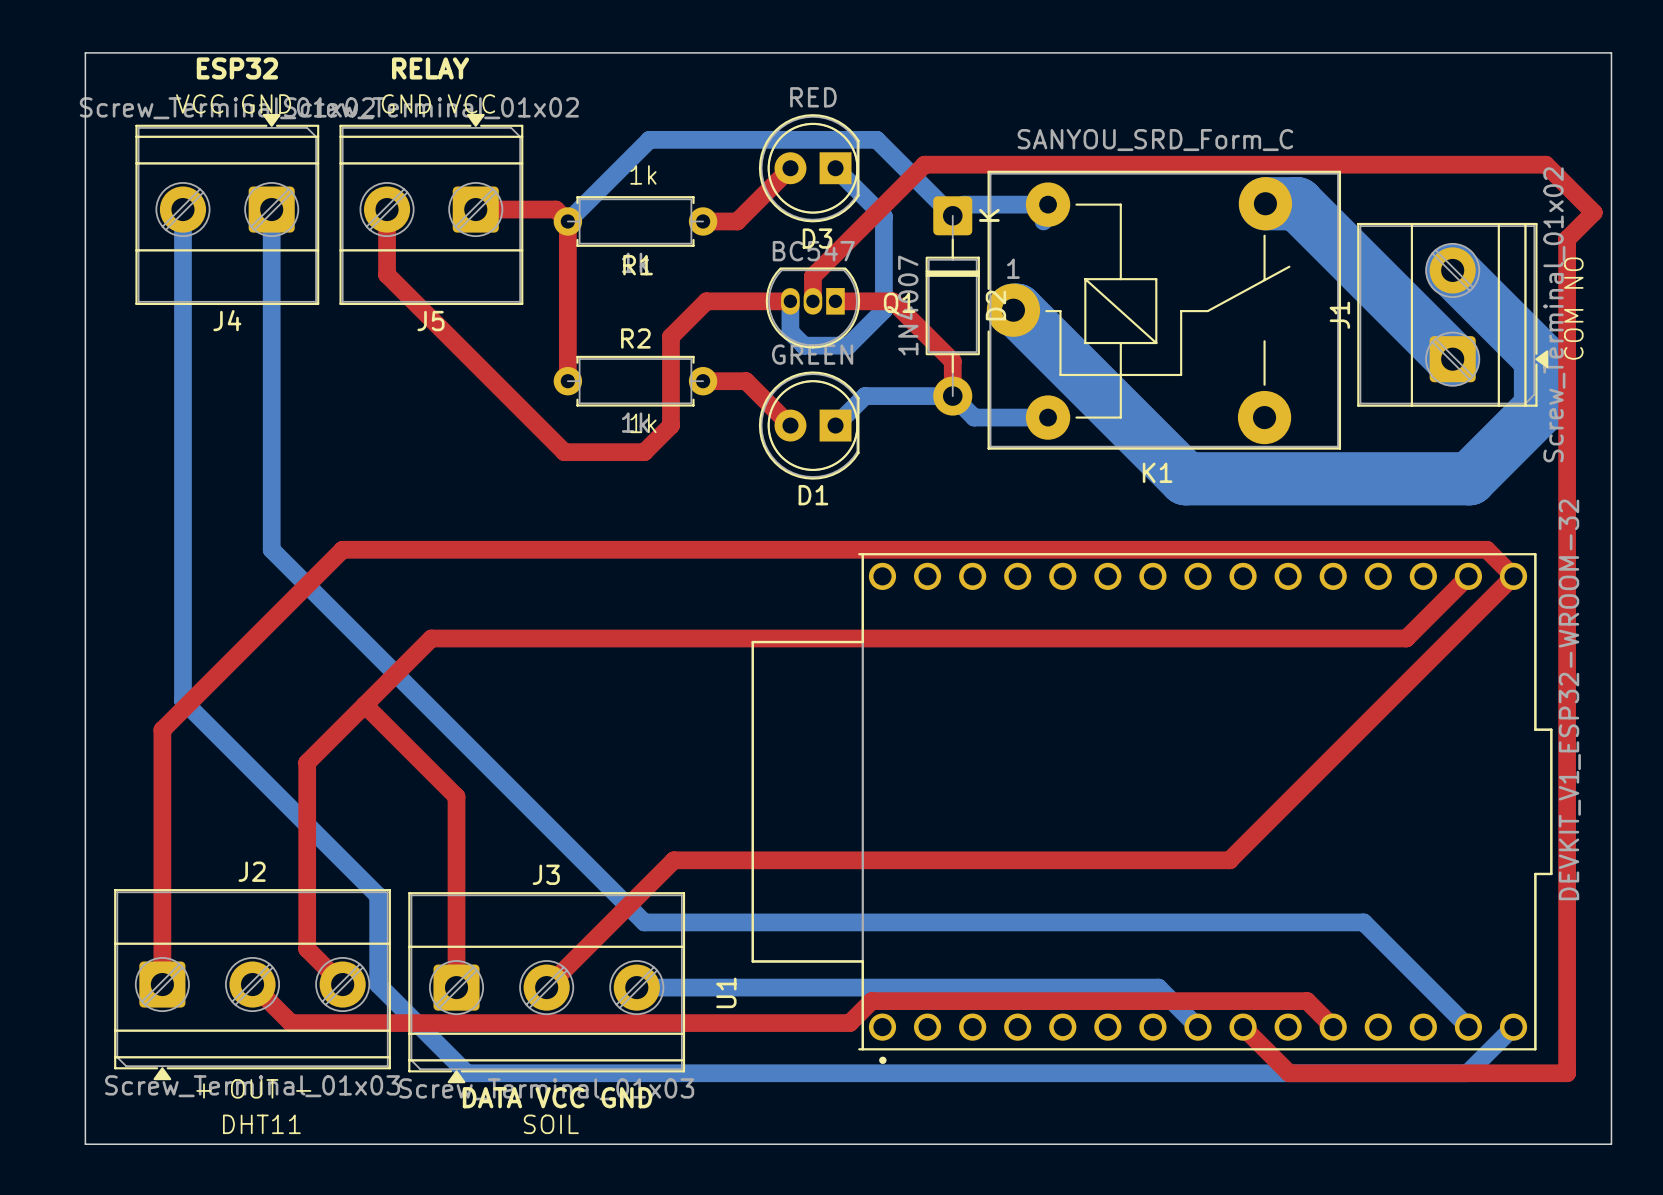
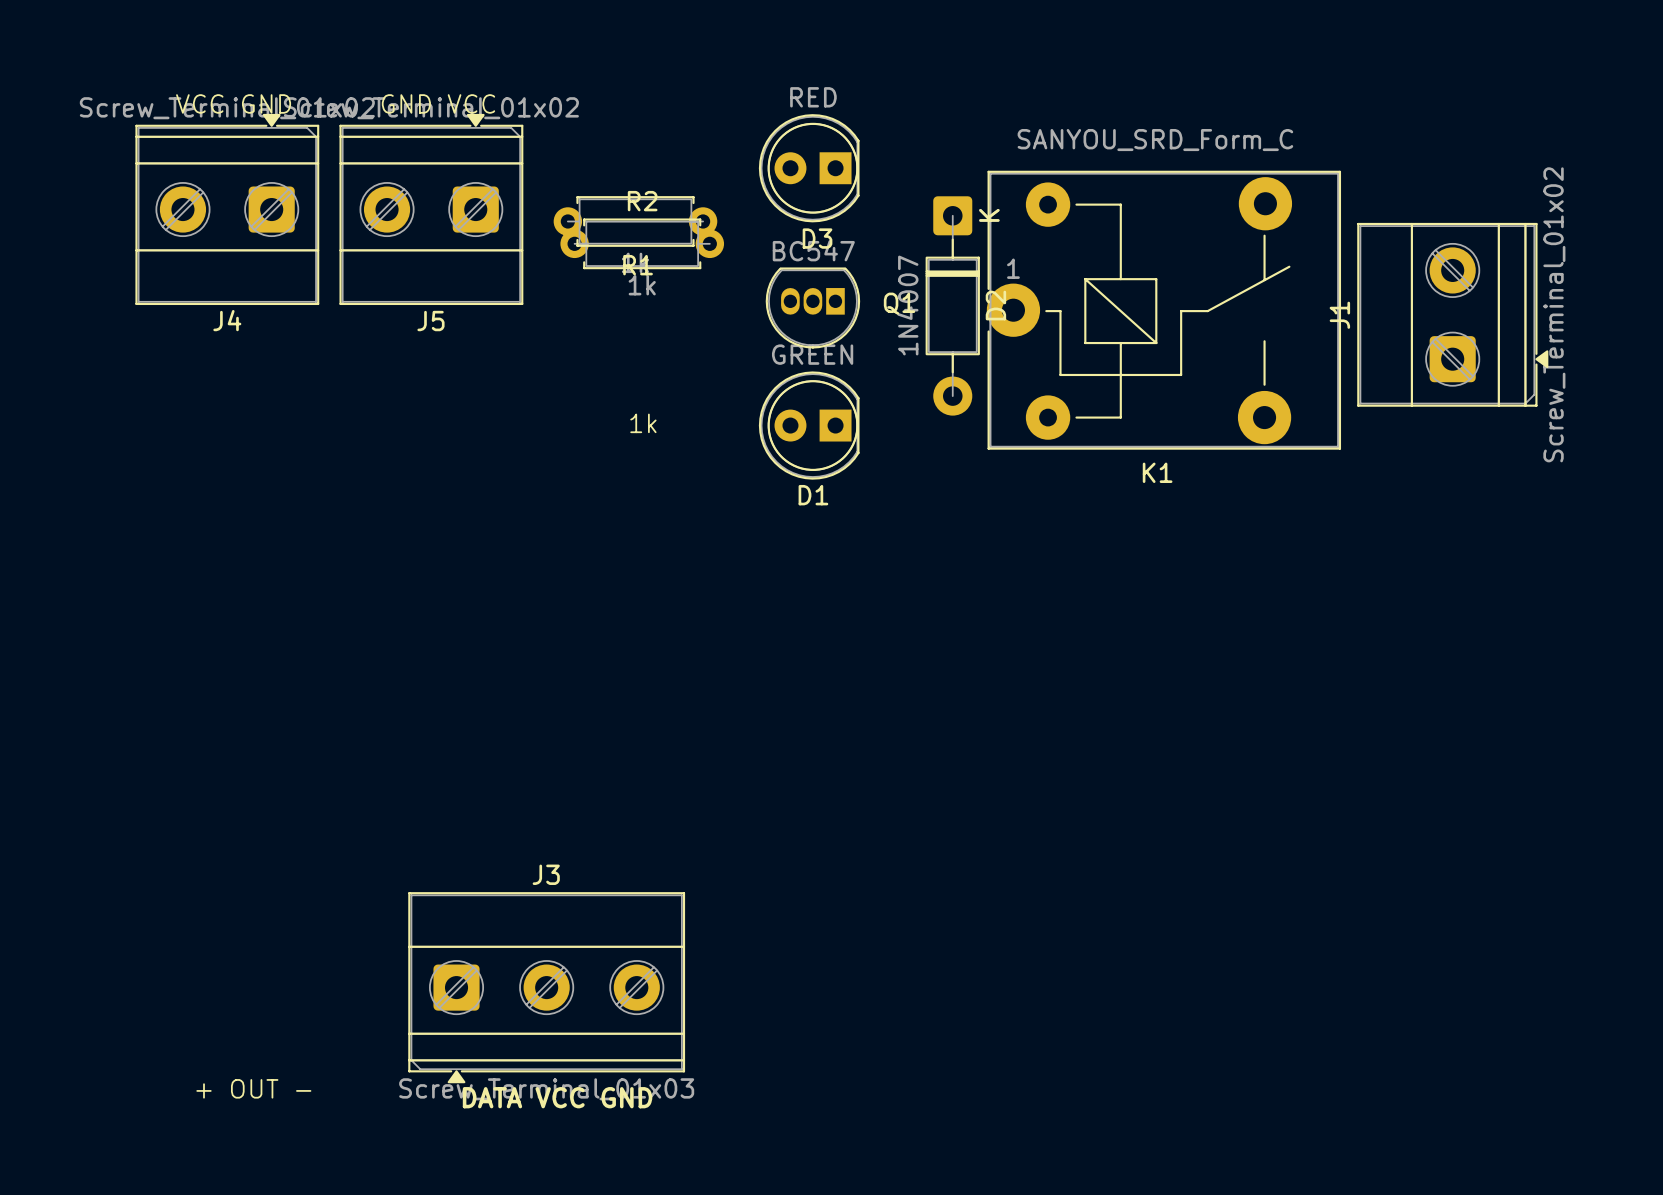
board edge: (85, 52) (1611, 52) (1611, 1144) (85, 1144) (85, 52) -> none
text: ESP32 (237, 68) -> none
text: RELAY (430, 68) -> none
top track: (790, 168) (737, 221) (703, 221) -> none
bottom track: (835, 168) (883, 216) (883, 310) (848, 345) (804, 345) (790, 332) (790, 301) -> none
text: 1k (643, 174) -> none
bottom track: (1265, 203) (1297, 203) (1452, 359) -> none
bottom track: (182, 209) (182, 700) (378, 895) (378, 984) (466, 1073) (1467, 1073) (1513, 1027) -> none
bottom track: (271, 209) (271, 549) (644, 922) (1363, 922) (1468, 1027) -> none
top track: (387, 209) (387, 274) (564, 452) (644, 452) (670, 425) (670, 336) (706, 301) (790, 301) -> none
top track: (475, 209) (555, 209) (567, 221) (567, 381) -> none
bottom track: (567, 221) (649, 139) (876, 139) (952, 215) (963, 204) (1048, 204) (1048, 217) (1043, 221) -> none
bottom track: (1452, 270) (1540, 358) (1540, 407) (1469, 478) (1185, 478) (1017, 310) (1013, 310) -> none
top track: (812, 301) (812, 276) (924, 164) (1545, 164) (1593, 212) (1567, 239) (1567, 1073) (1289, 1073) (1243, 1027) -> none
top track: (835, 301) (892, 301) (952, 361) (952, 396) -> none
text: COM NO (1573, 308) -> none
R2 position: (635, 381) -> (642, 243)
top track: (703, 381) (746, 381) (790, 425) -> none
bottom track: (1048, 417) (974, 417) (952, 396) (865, 396) (835, 425) -> none
top track: (1468, 576) (1406, 638) (431, 638) (307, 762) (307, 949) (342, 984) -> none
top track: (364, 705) (456, 796) (456, 987) -> none
U1: DEVKIT_V1_ESP32-WROOM-32 (1152, 808) -> none
top track: (1229, 859) (1513, 576) (1486, 549) (342, 549) (162, 730) (162, 984) -> none
top track: (1229, 860) (673, 860) (546, 987) -> none
top track: (252, 984) (291, 1023) (849, 1023) (871, 1001) (1307, 1001) (1333, 1027) -> none
J2: Screw_Terminal_01x03 (252, 984) -> none
bottom track: (636, 987) (1158, 987) (1198, 1027) -> none
text: DHT11 (261, 1124) -> none
text: SOIL (551, 1124) -> none

